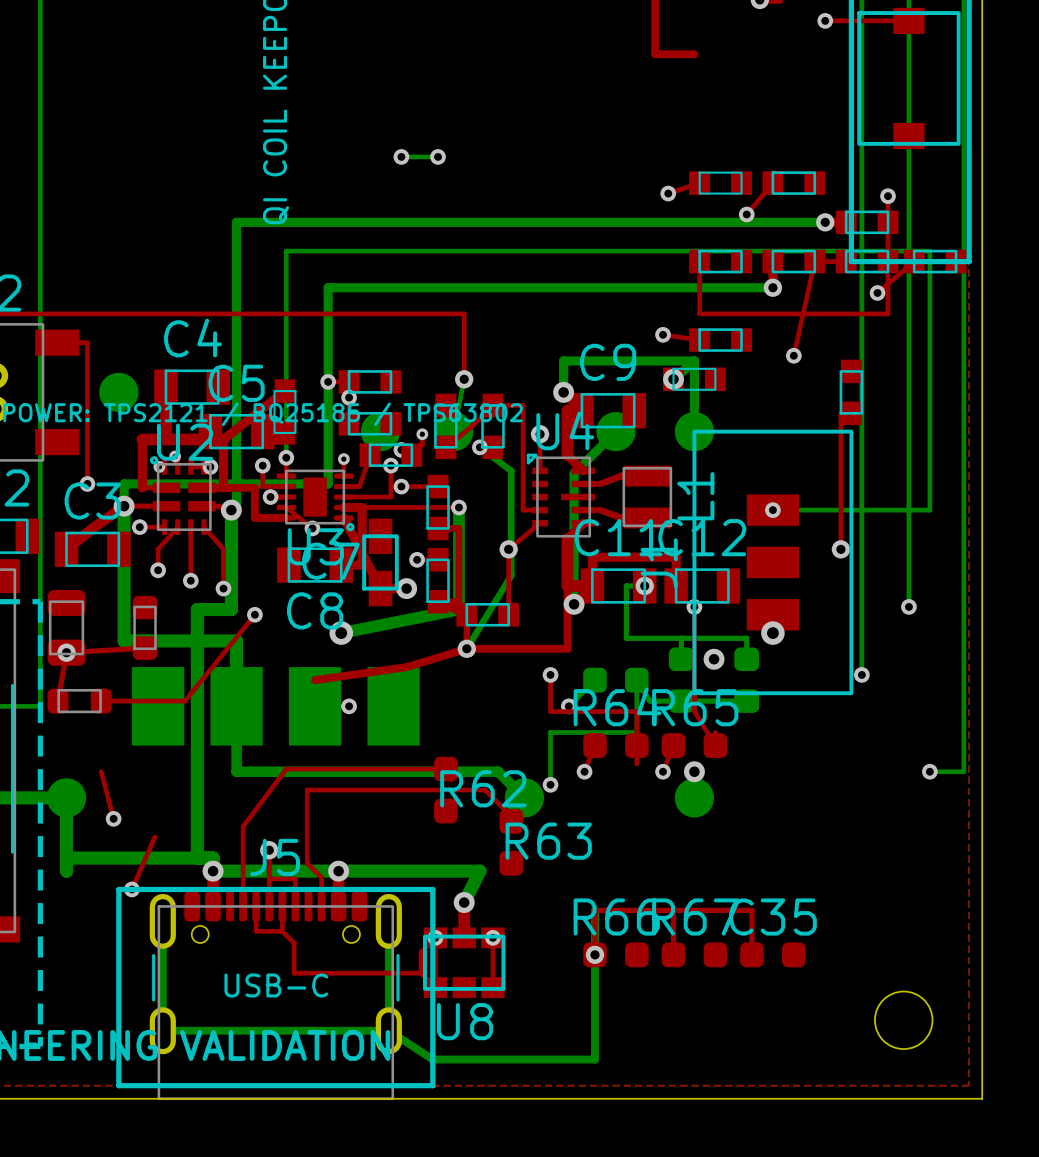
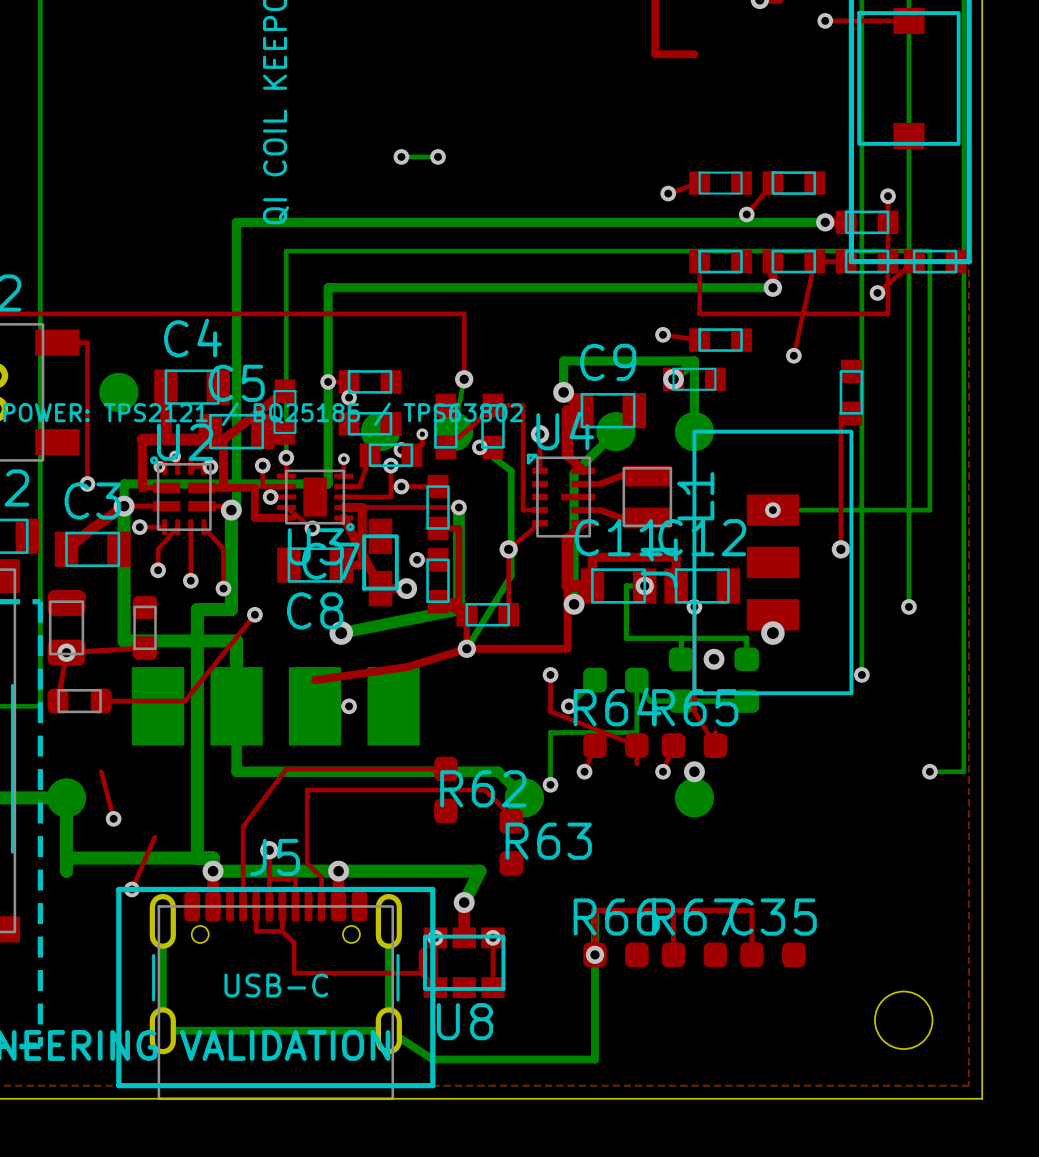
top track: (550, 711) (636, 711) (636, 745) -> (550, 711) (636, 745)

